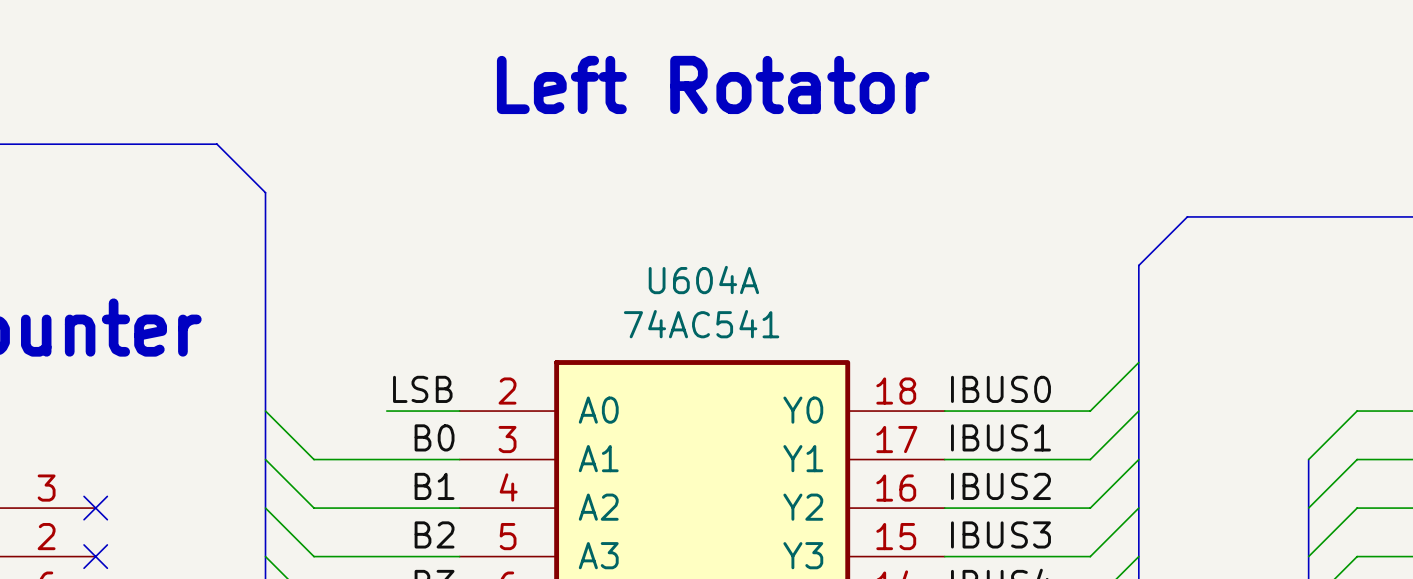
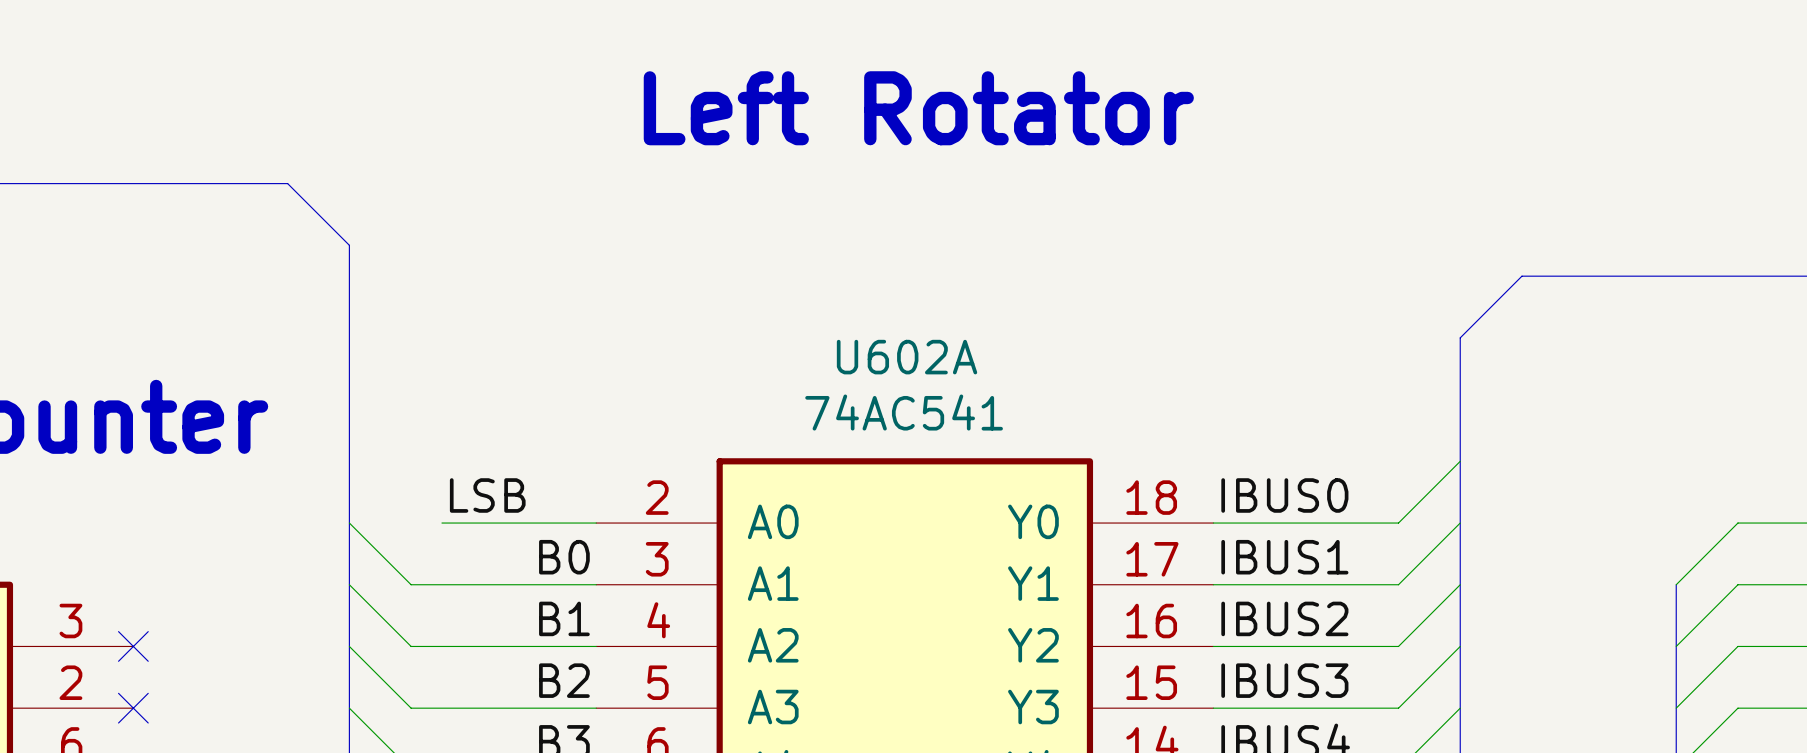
U604A name: U604A (703, 280) -> U602A (907, 357)
label position: LSB (422, 389) -> LSB (487, 495)
wire: none -> (441, 523) (503, 523)

